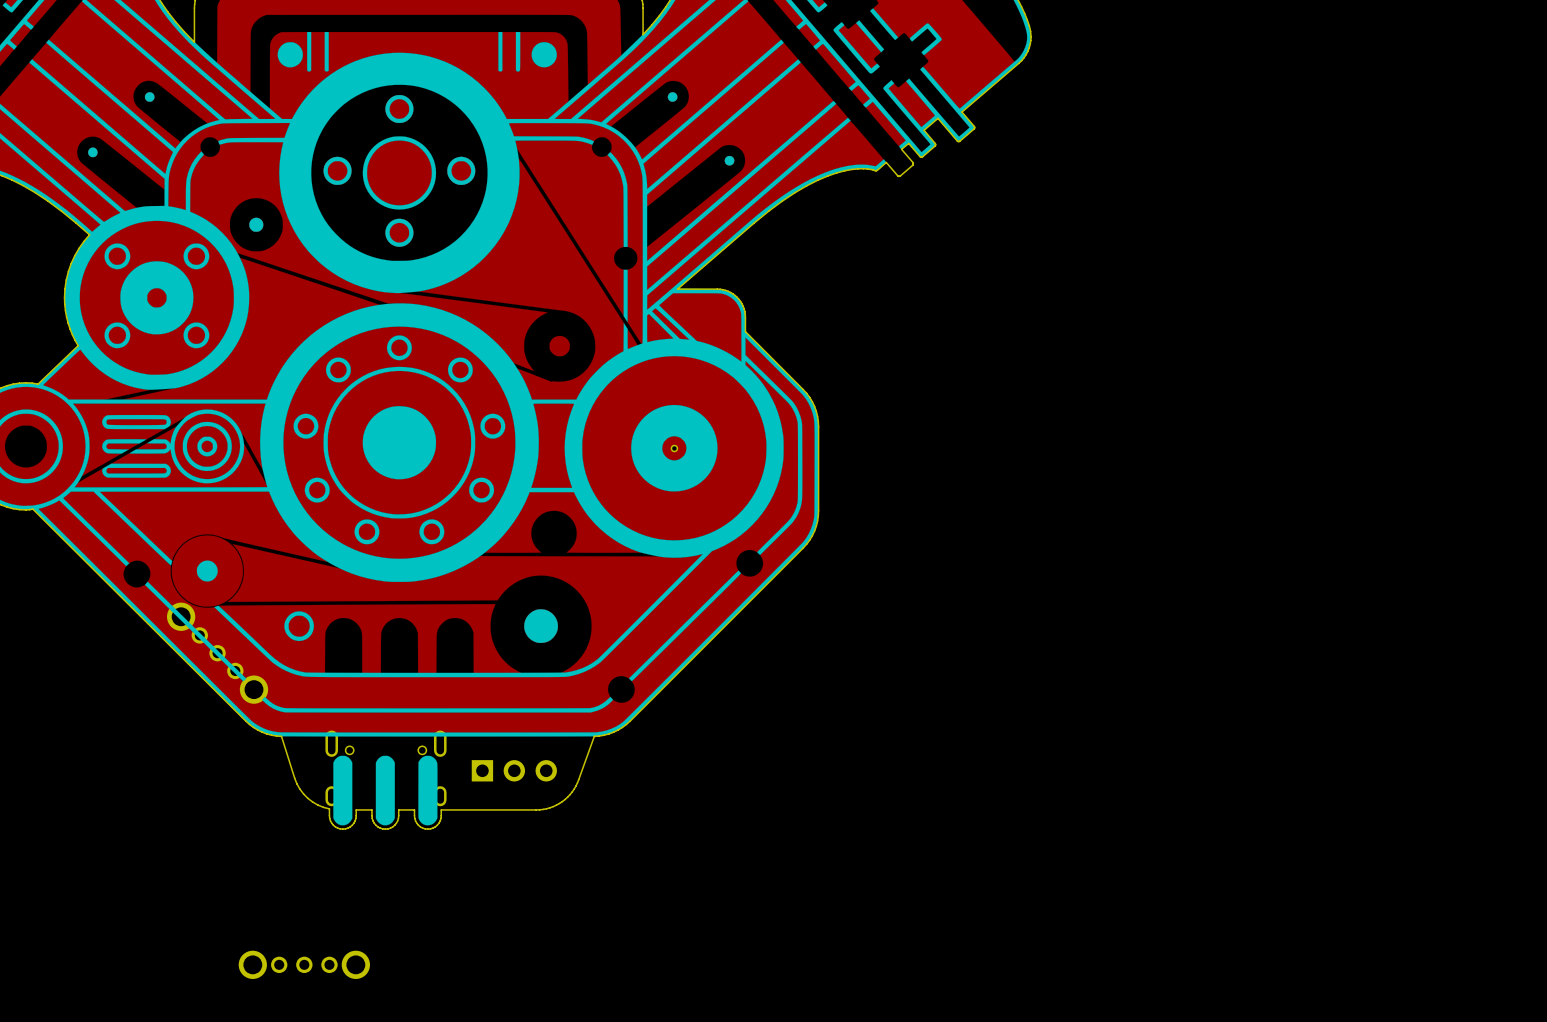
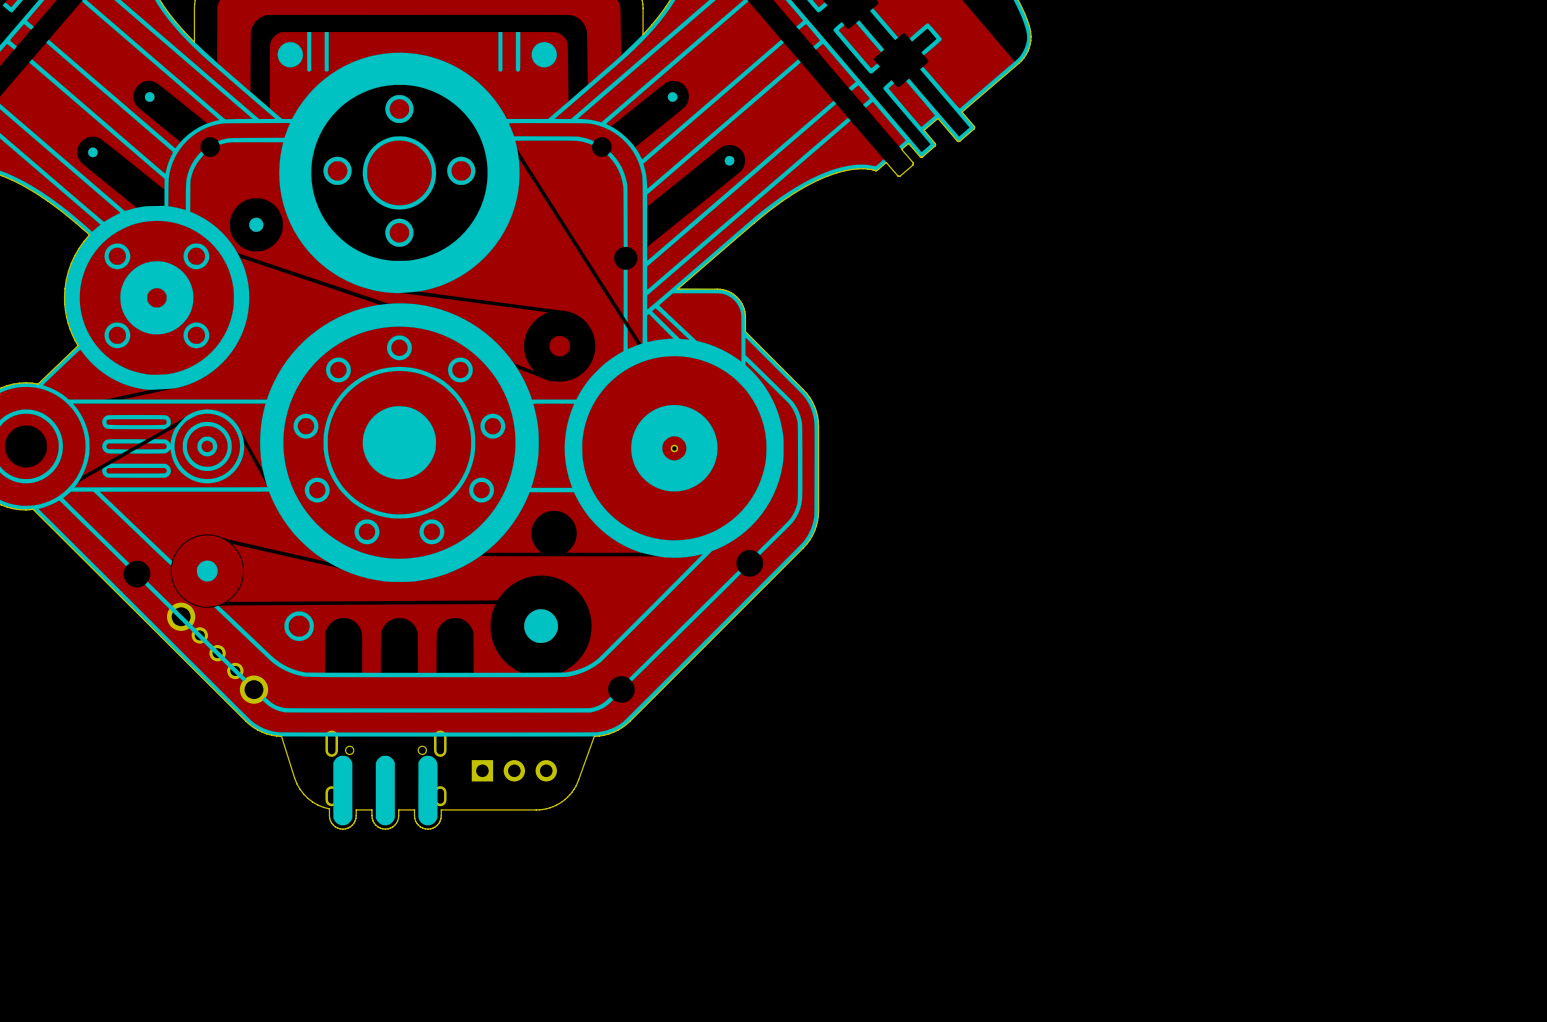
part: (304, 964) -> none

